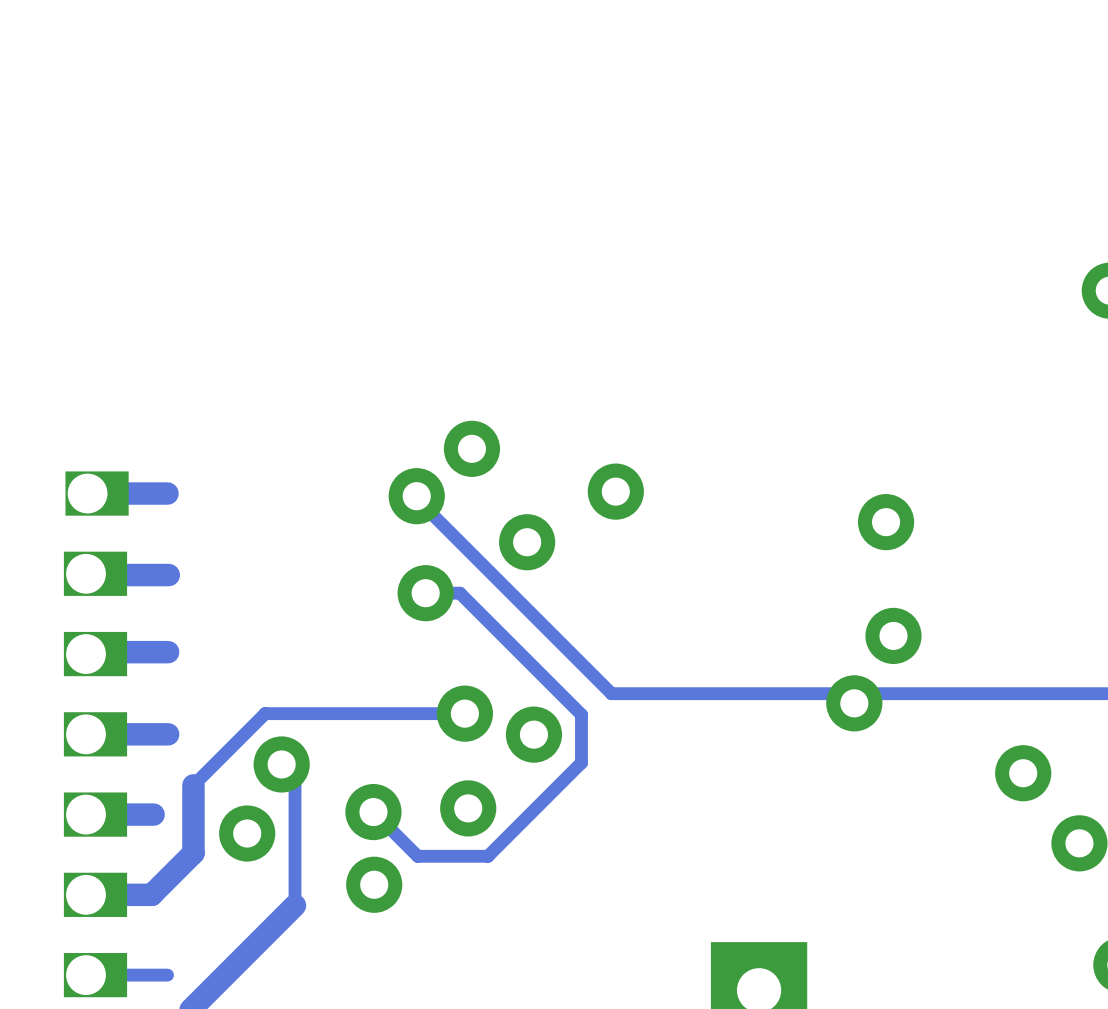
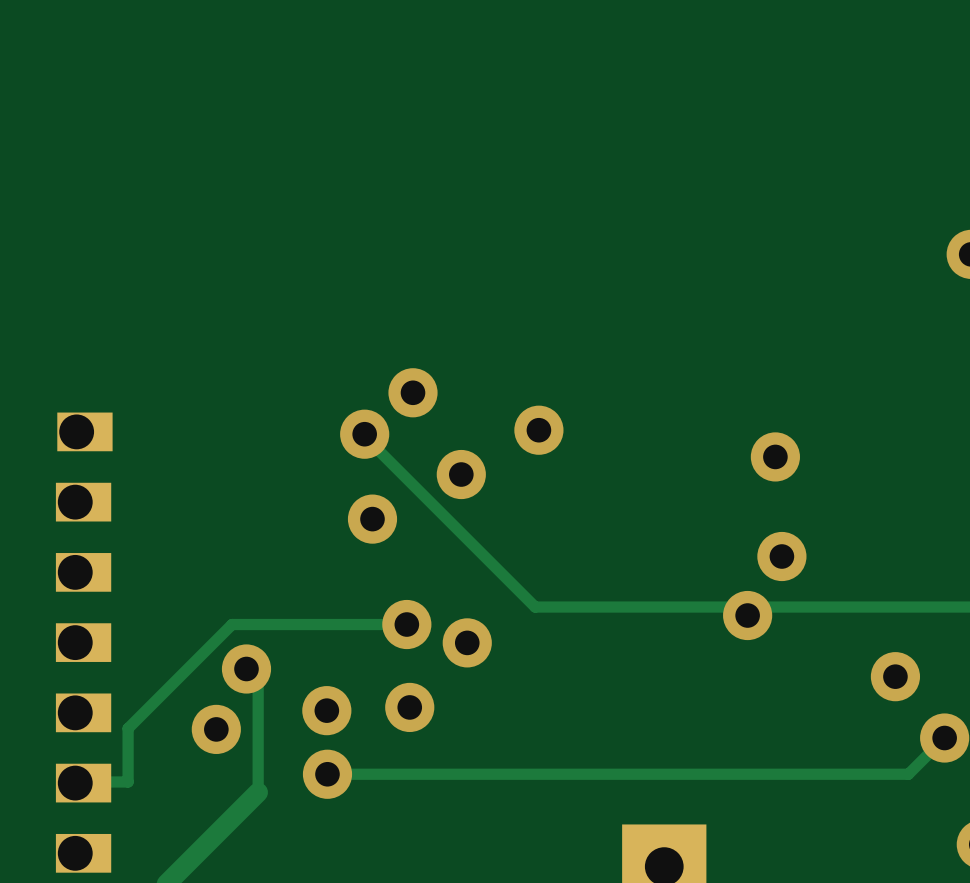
track: (167, 493) (87, 493) -> none
track: (86, 573) (168, 575) -> none
track: (425, 593) (459, 593) (581, 714) (581, 762) (487, 856) (417, 856) (373, 812) -> none
track: (168, 652) (87, 652) (86, 654) -> none
track: (168, 734) (86, 734) -> none
track: (193, 785) (193, 853) (151, 894) (86, 894) -> (169, 687) (128, 728) (128, 781) (75, 781)
track: (153, 814) (86, 814) -> none
track: none -> (944, 738) (908, 774) (327, 774)
track: (167, 975) (86, 975) -> none

